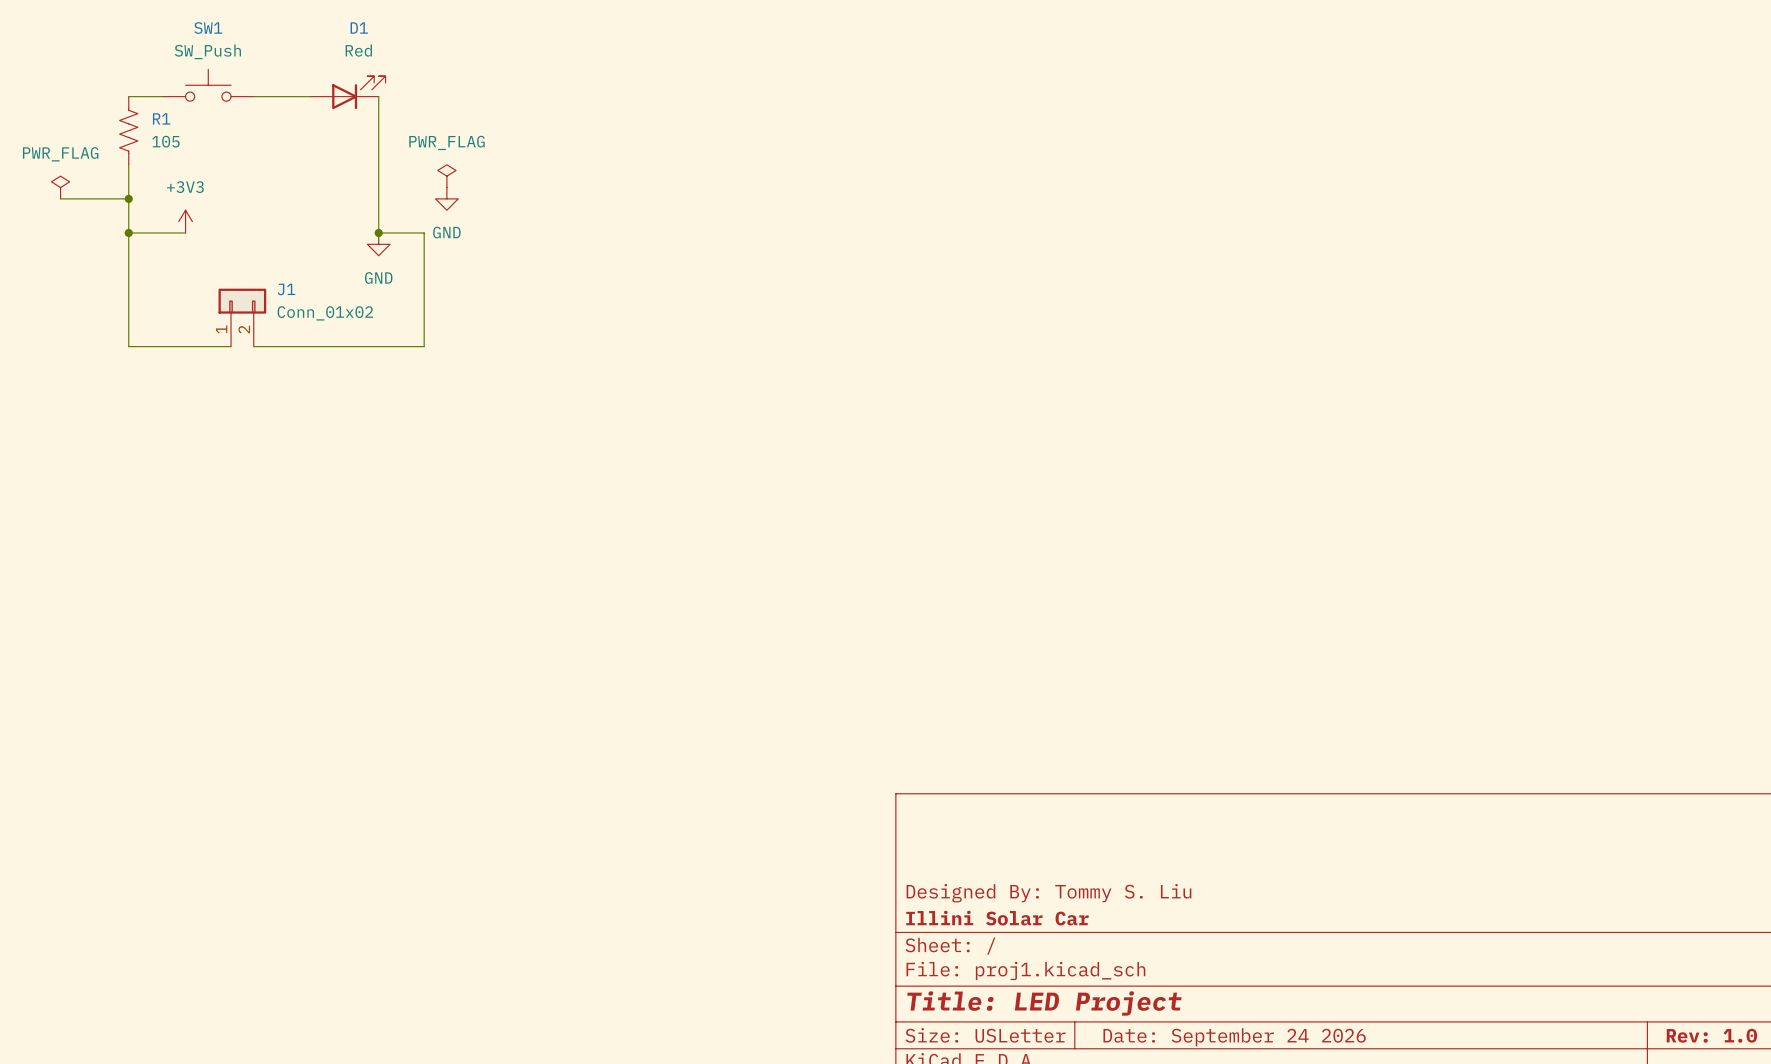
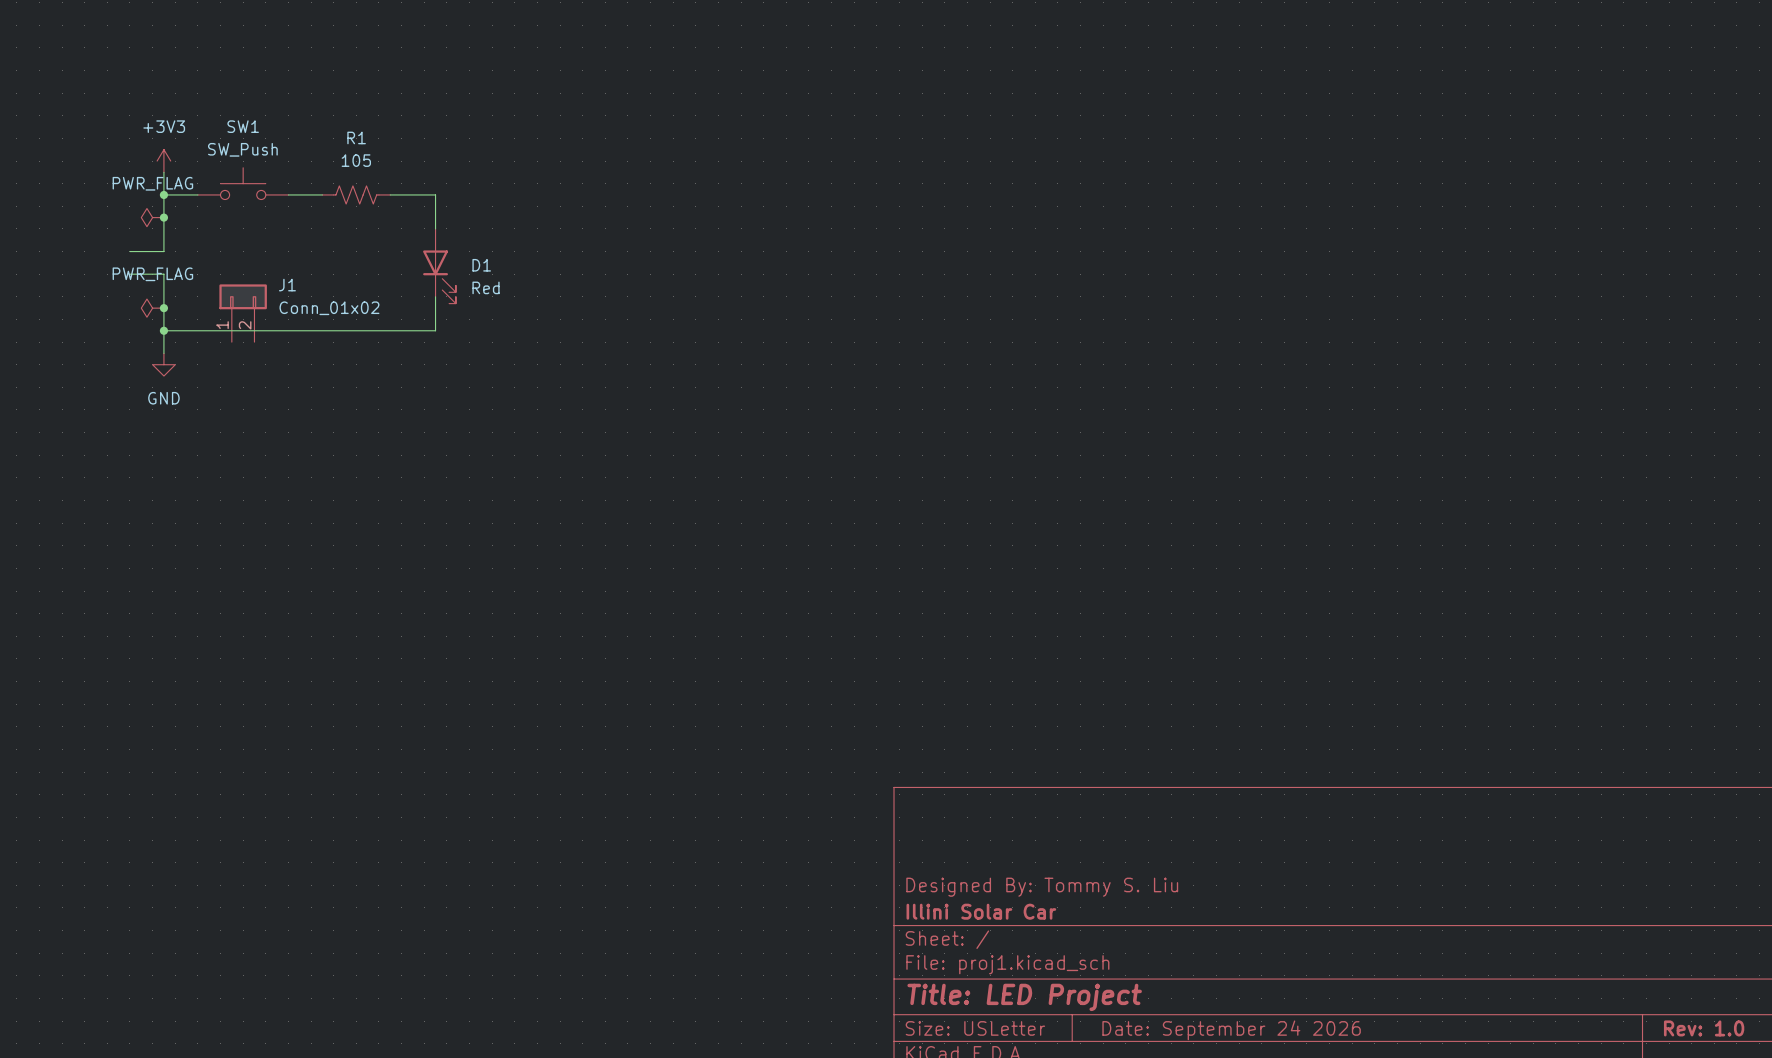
D1 name position: D1 (359, 28) -> D1 (481, 265)
SW1 position: (208, 85) -> (243, 183)
D1 position: (348, 92) -> (439, 266)
D1 rotation: 0° (358, 92) -> 90° clockwise (439, 277)
wire: (128, 96) (162, 96) -> (163, 194) (197, 194)
wire: (253, 96) (310, 96) -> none
wire: (378, 96) (378, 232) (424, 232) (424, 346) (253, 346) -> none
R1 name position: R1 (161, 118) -> R1 (356, 137)
R1 rotation: 0° (128, 130) -> 90° clockwise (356, 194)
R1 position: (128, 130) -> (356, 194)
R1 value position: 105 (166, 141) -> 105 (356, 160)
wire: (128, 164) (128, 346) (231, 346) -> none
wire: none -> (163, 172) (163, 251) (129, 251)
power symbol: PWR_FLAG (446, 176) -> none
power symbol: PWR_FLAG (60, 187) -> none
wire: (60, 198) (128, 198) -> none
junction: (128, 198) -> none
junction: none -> (163, 194)
wire: none -> (288, 194) (322, 194)
wire: none -> (390, 194) (435, 194) (435, 228)
power symbol: GND (446, 198) -> none
power symbol: none -> PWR_FLAG (152, 217)
junction: none -> (163, 217)
power symbol position: +3V3 (185, 221) -> +3V3 (163, 161)
wire: (128, 232) (185, 232) -> none
junction: (128, 232) -> none
junction: (378, 232) -> none
power symbol: GND (378, 244) -> none
wire: none -> (129, 274) (163, 274) (163, 353)
wire: none -> (435, 296) (435, 330) (163, 330)
power symbol: none -> PWR_FLAG (152, 308)
junction: none -> (163, 308)
junction: none -> (163, 330)
power symbol: none -> GND (163, 364)

